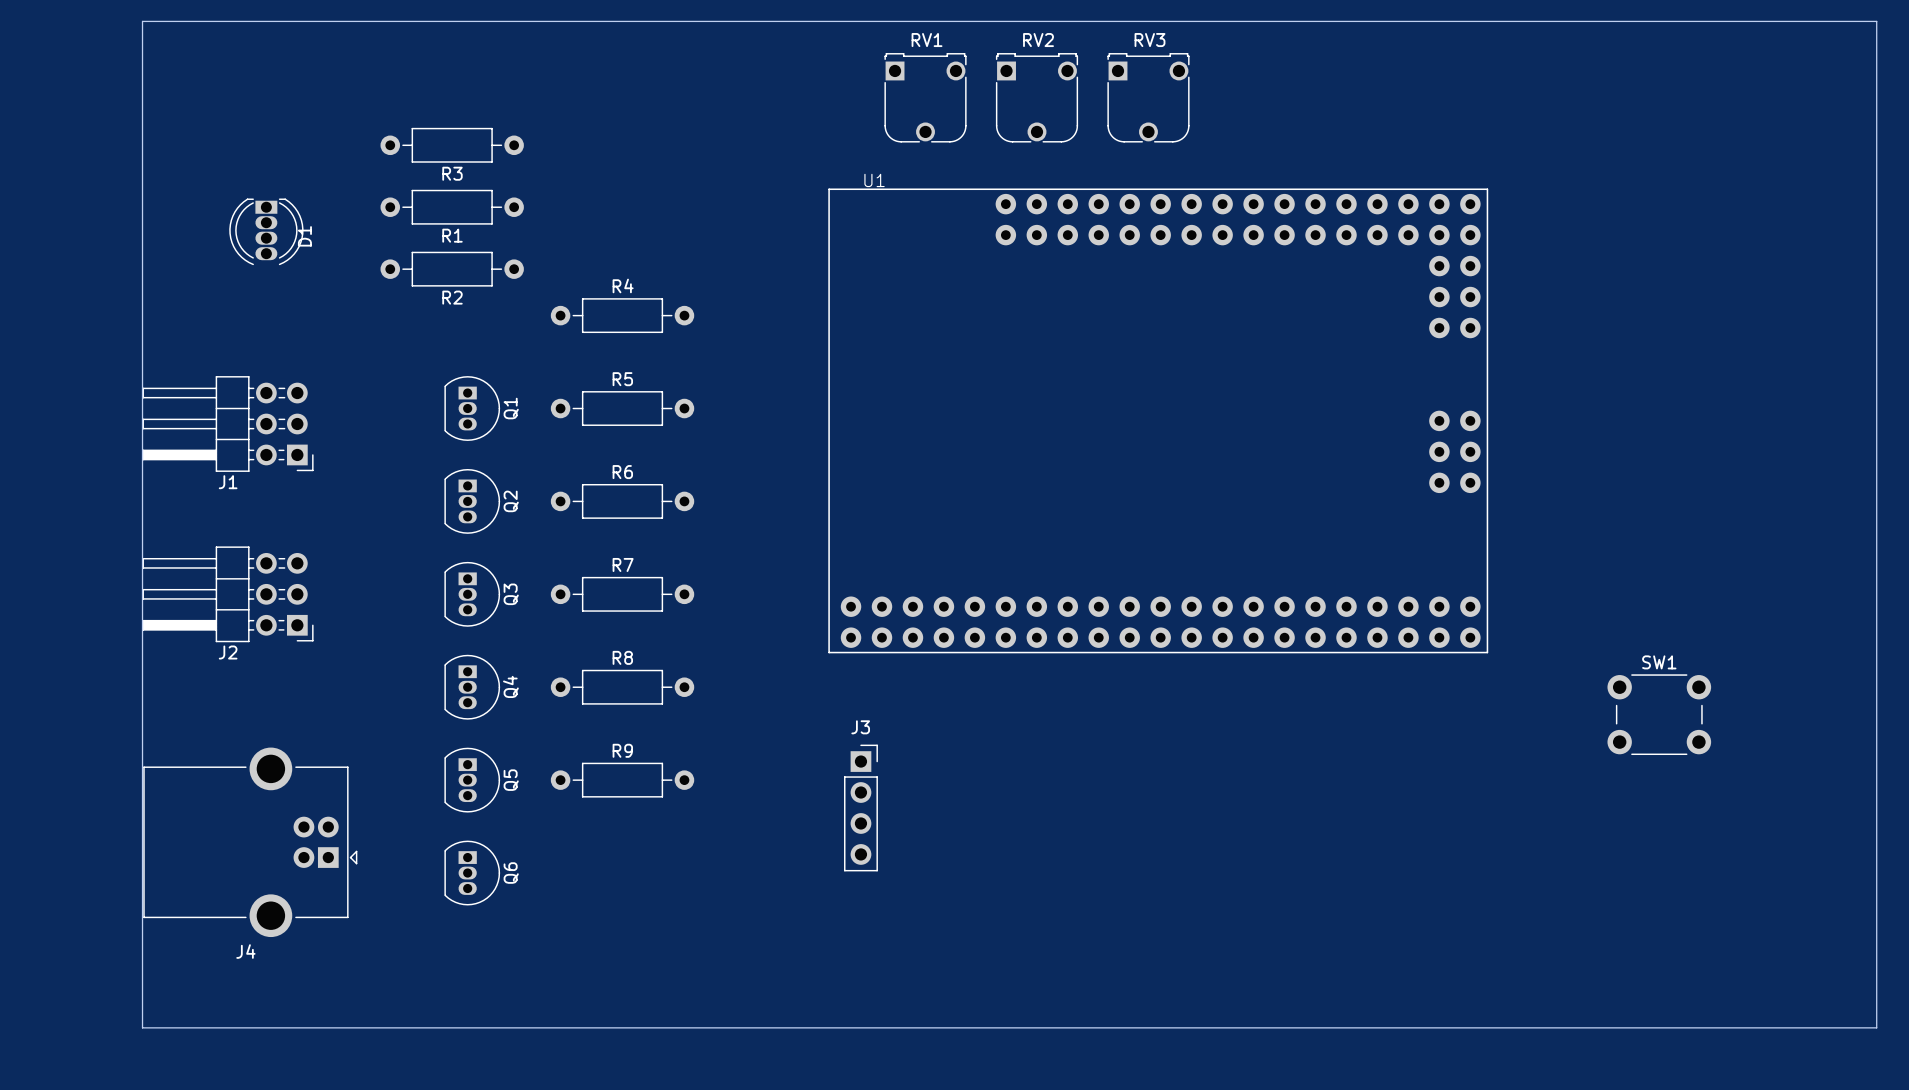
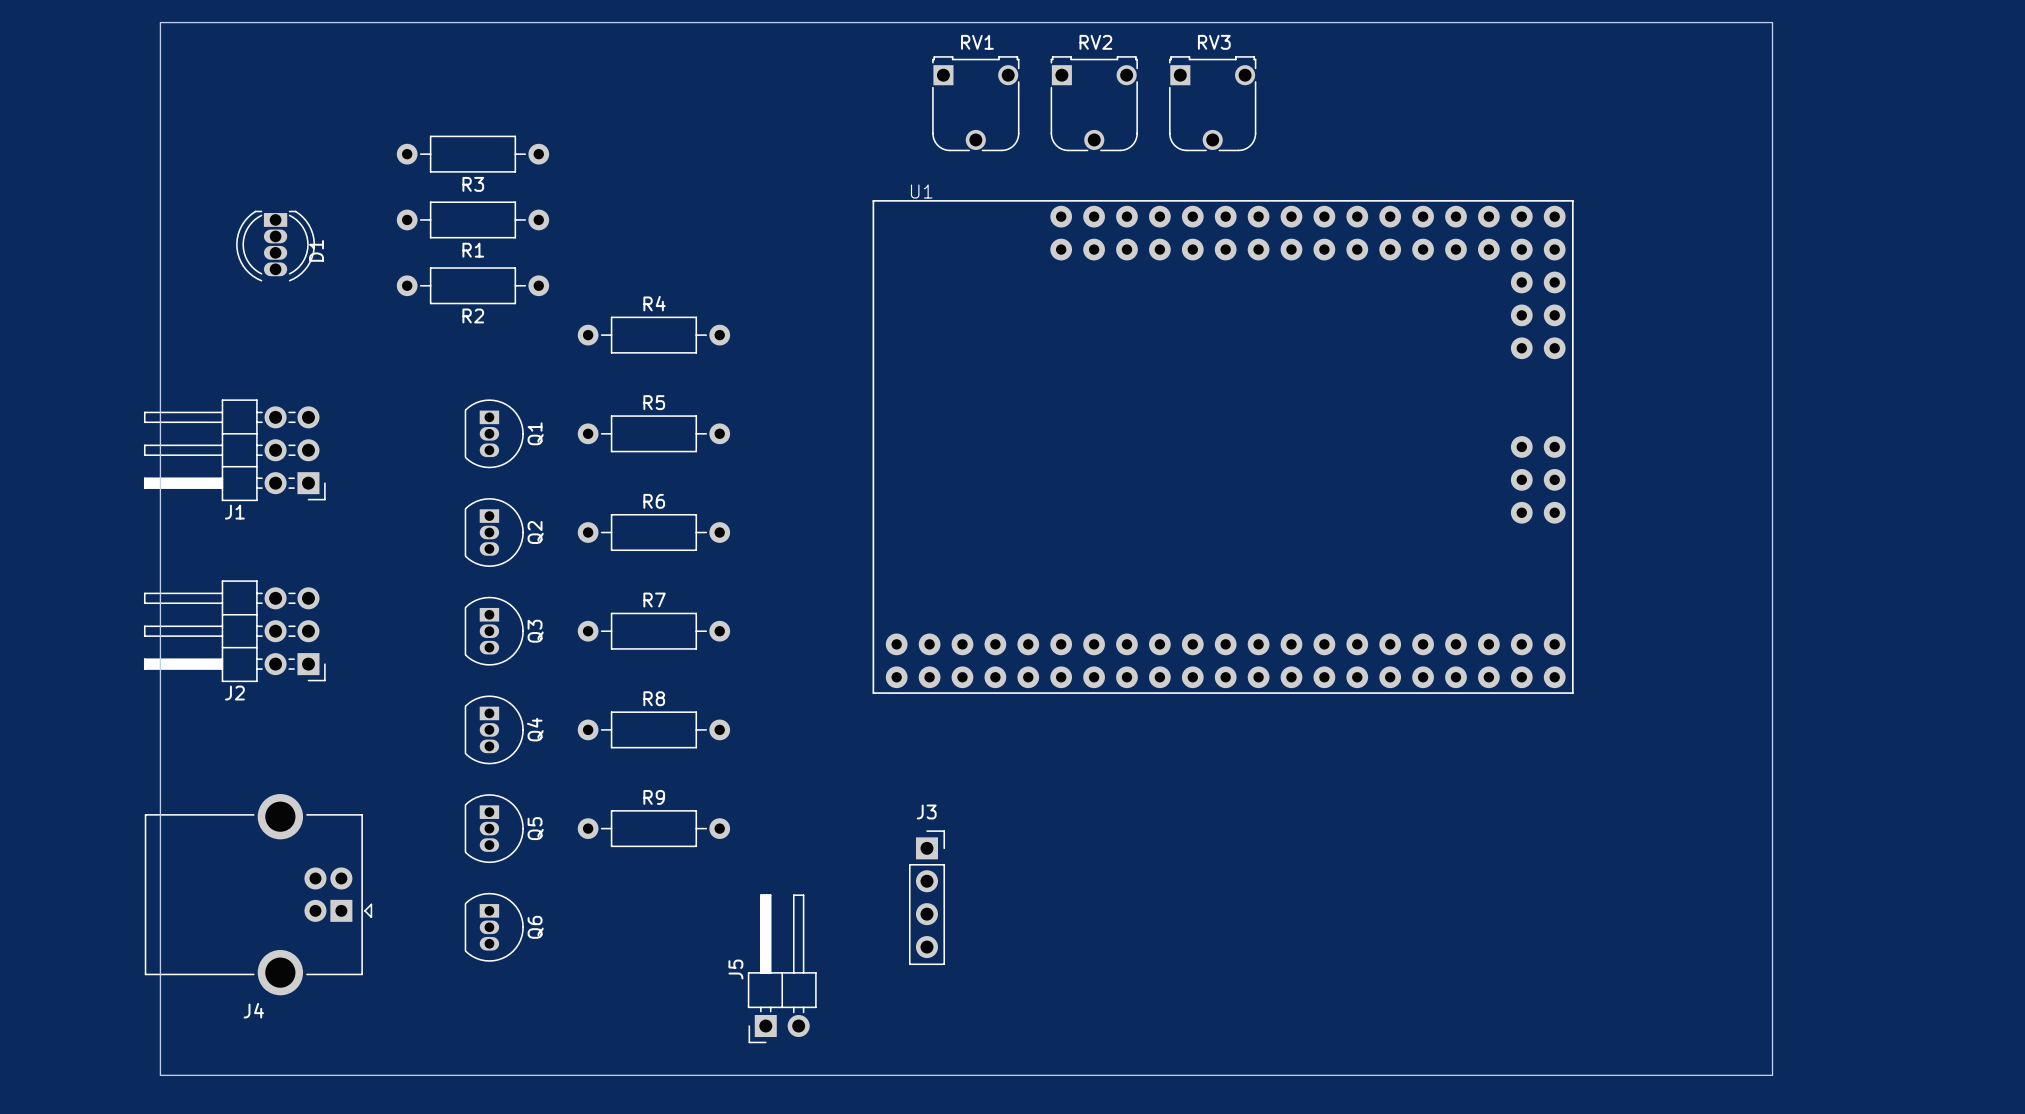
board edge: (158, 21) (142, 21) (142, 1027) (1876, 1027) (1876, 21) (1675, 21) -> (160, 22) (160, 1075) (1772, 1075) (1772, 22)
SW1: (1659, 714) -> none
J3 position: (860, 808) -> (926, 897)
J5: none -> (782, 968)

